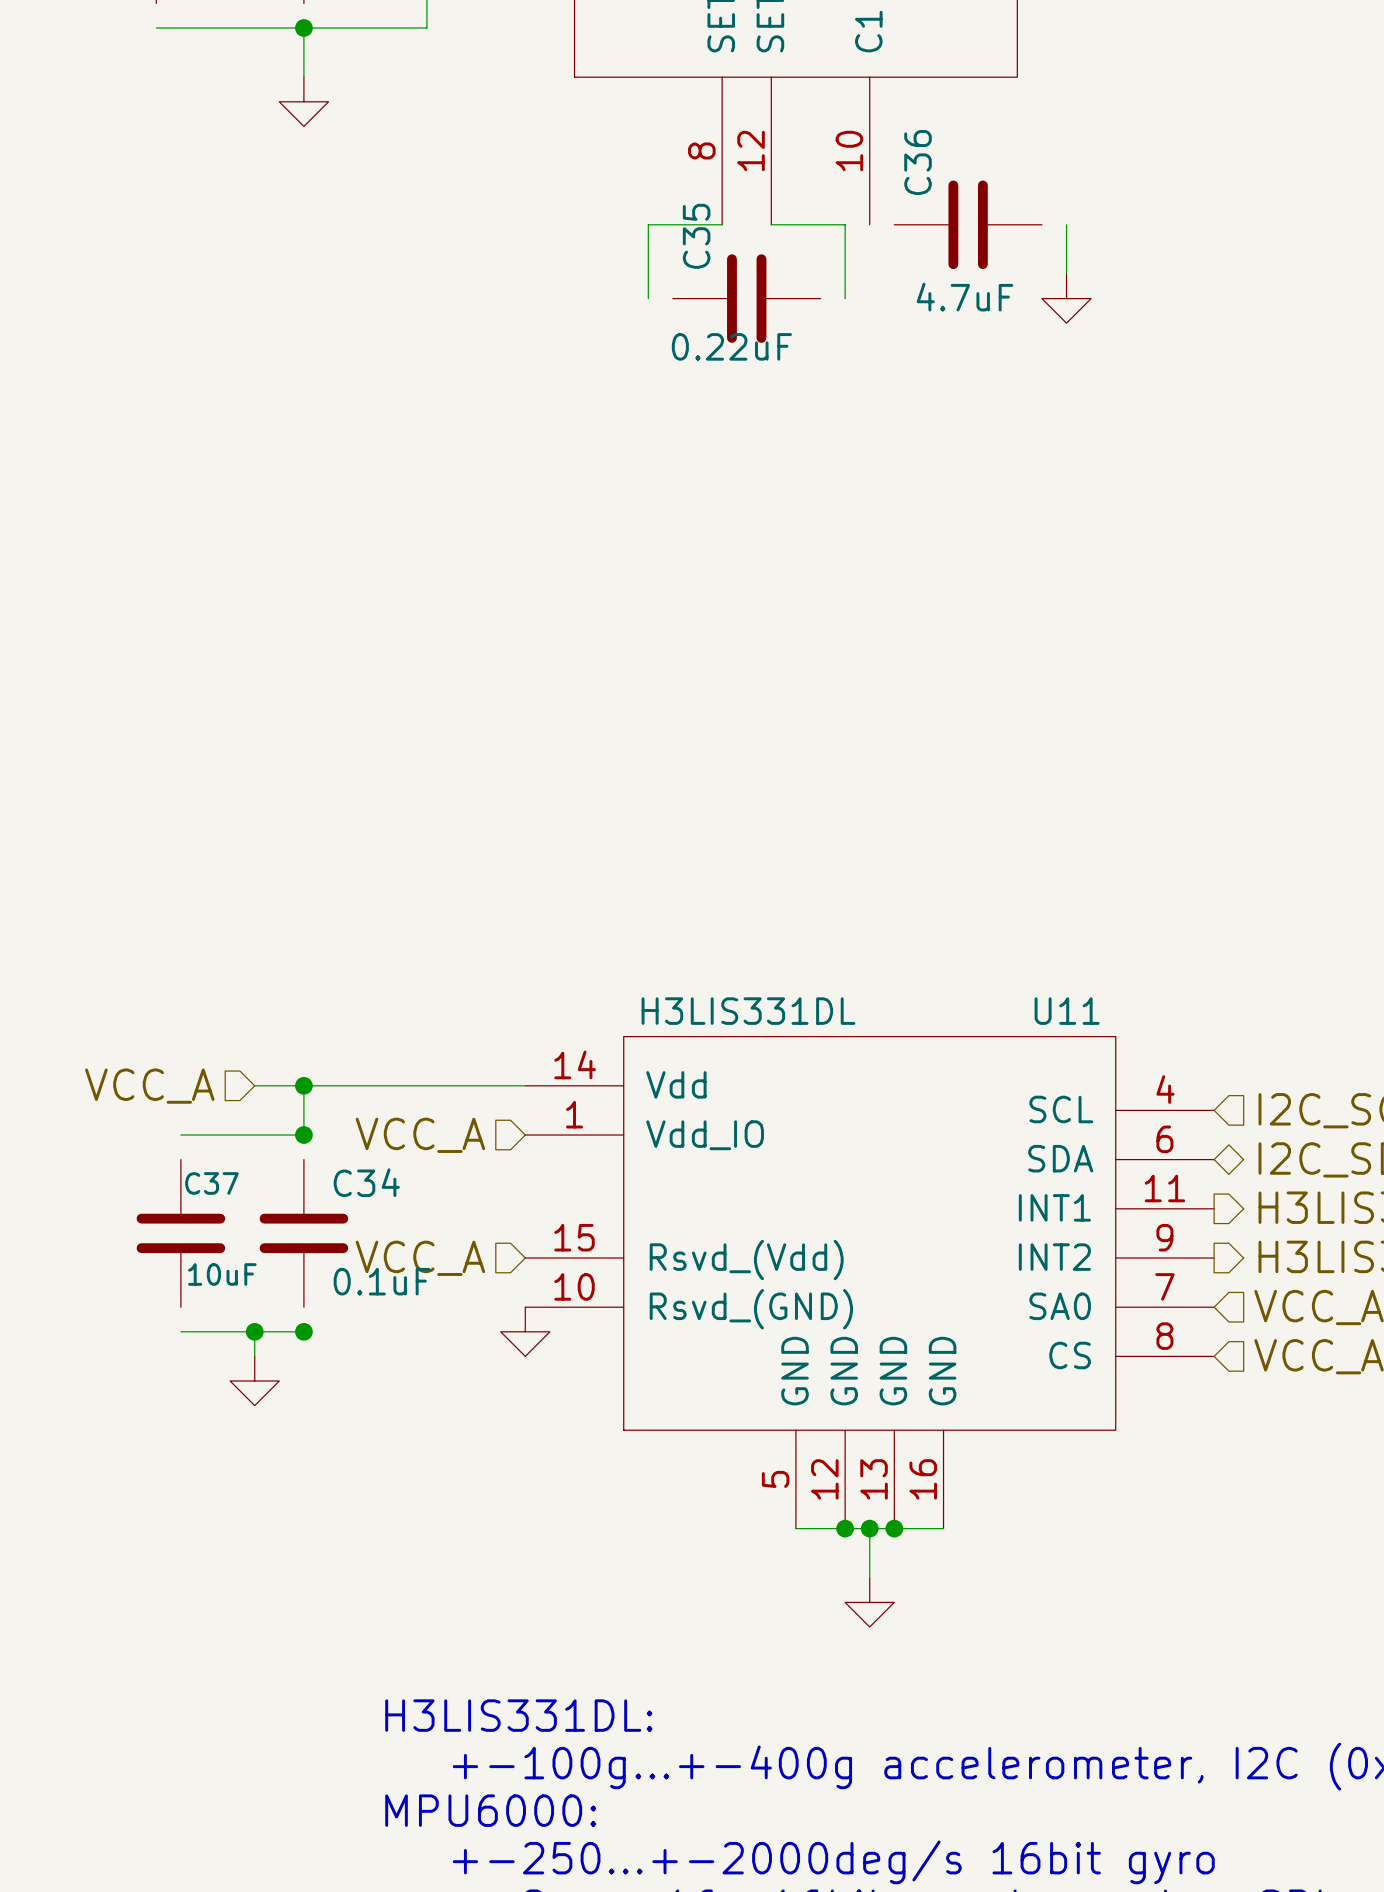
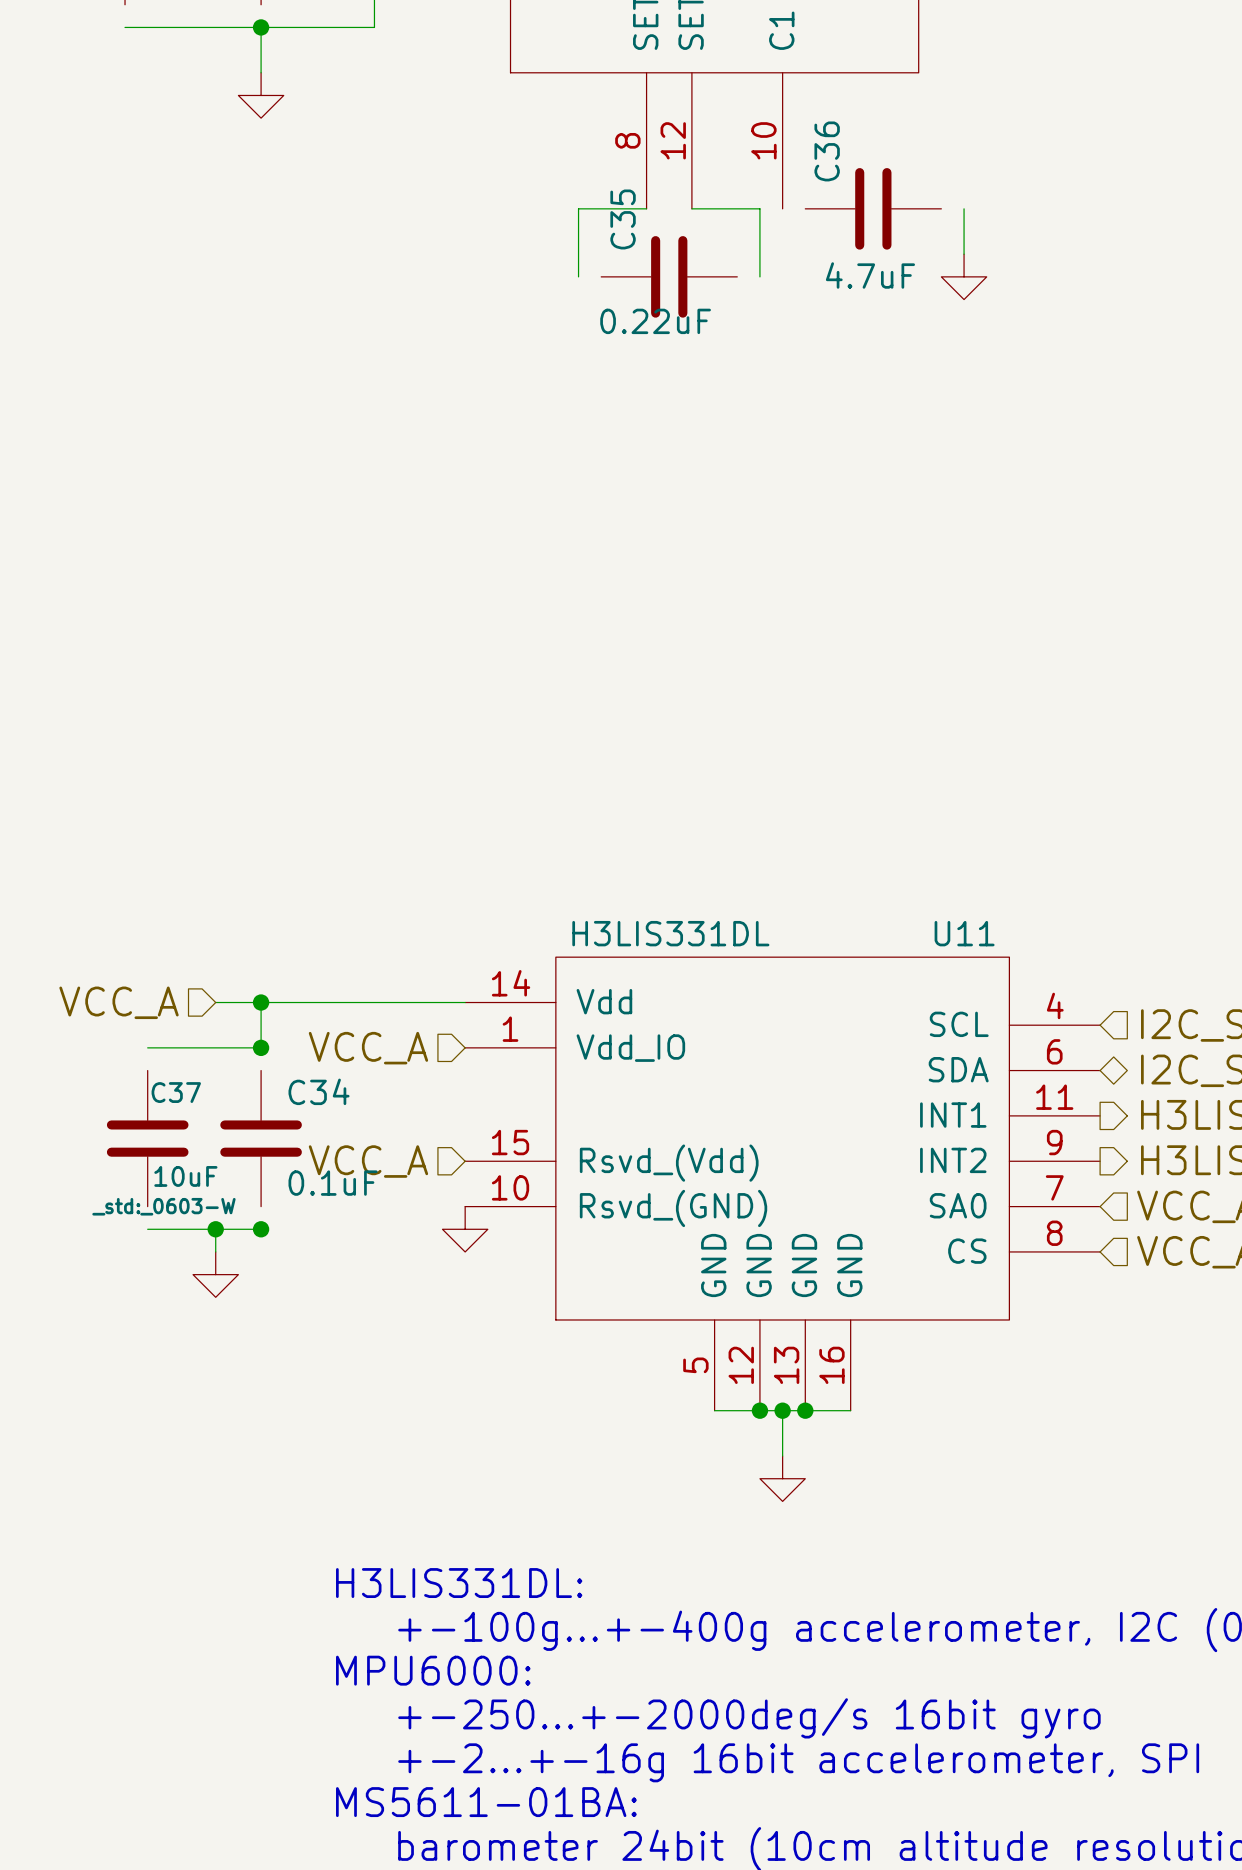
C37 text: none -> _std:_0603-W (163, 1206)

